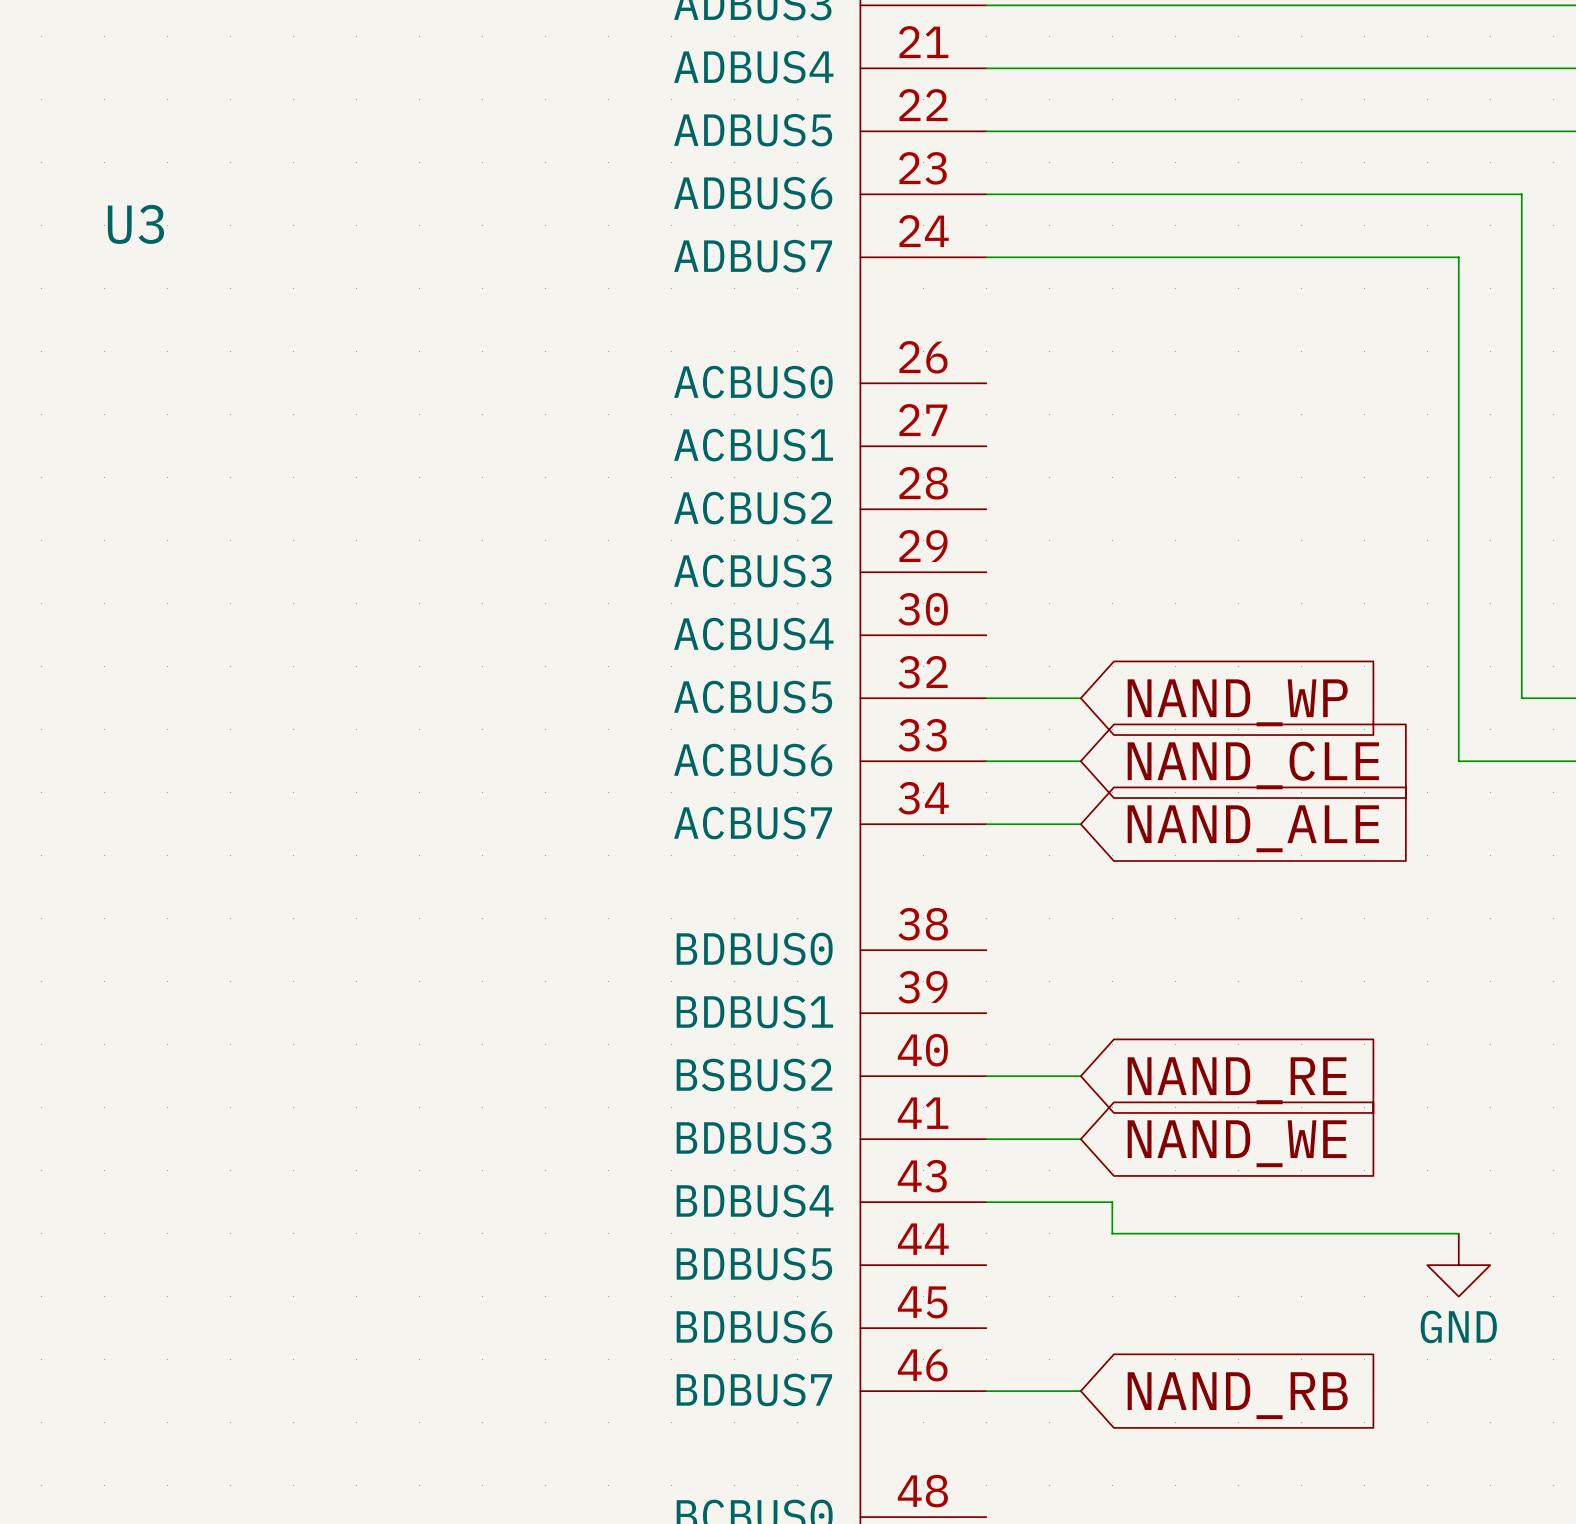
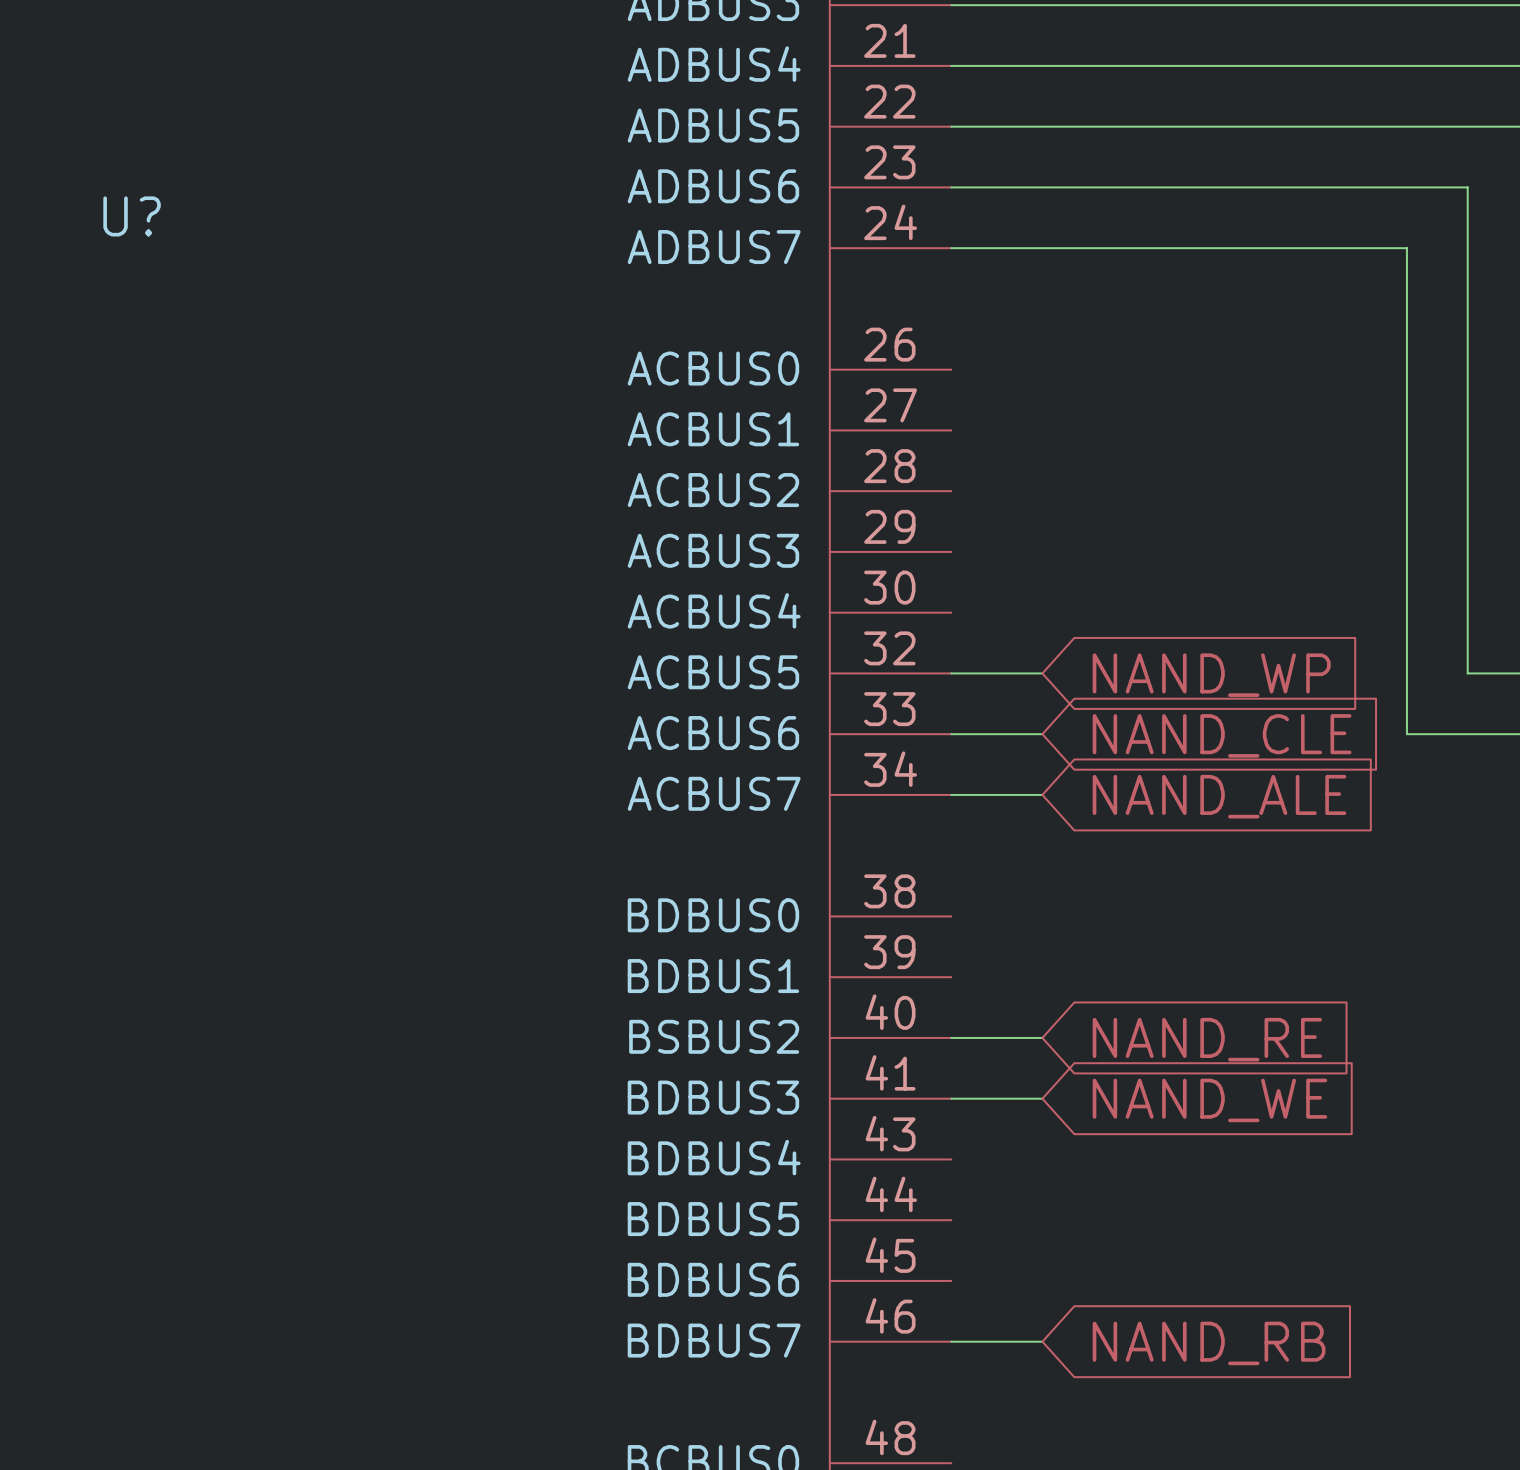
U3 name: U3 (135, 224) -> U? (132, 216)
wire: (986, 1202) (1112, 1202) (1112, 1233) (1458, 1233) -> none
power symbol: GND (1458, 1265) -> none

